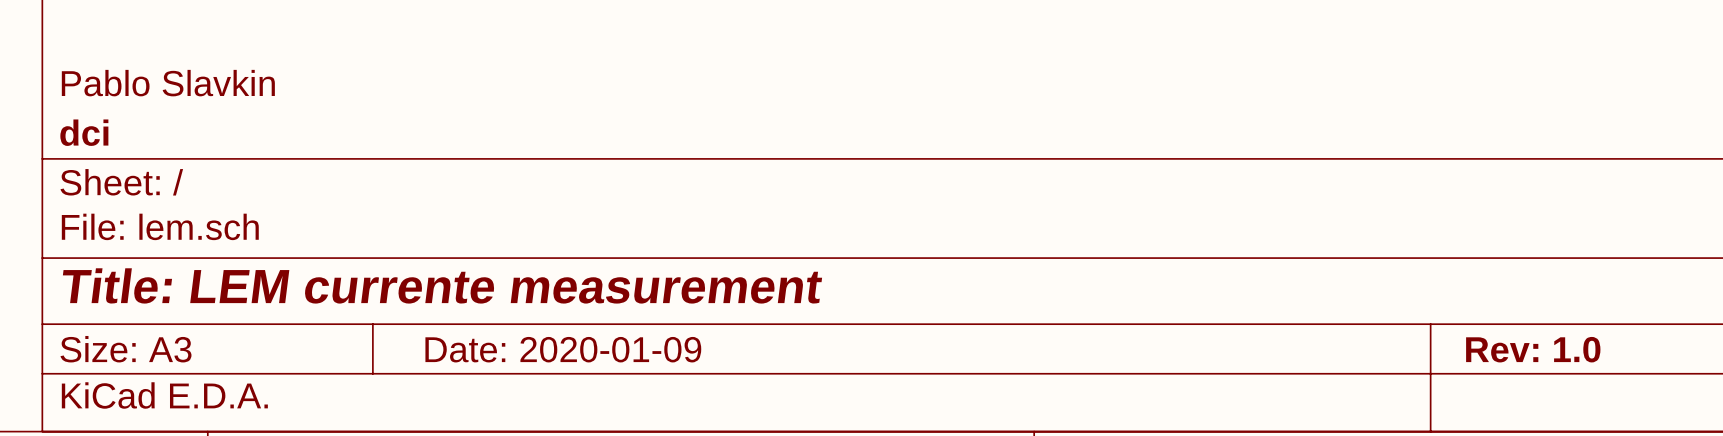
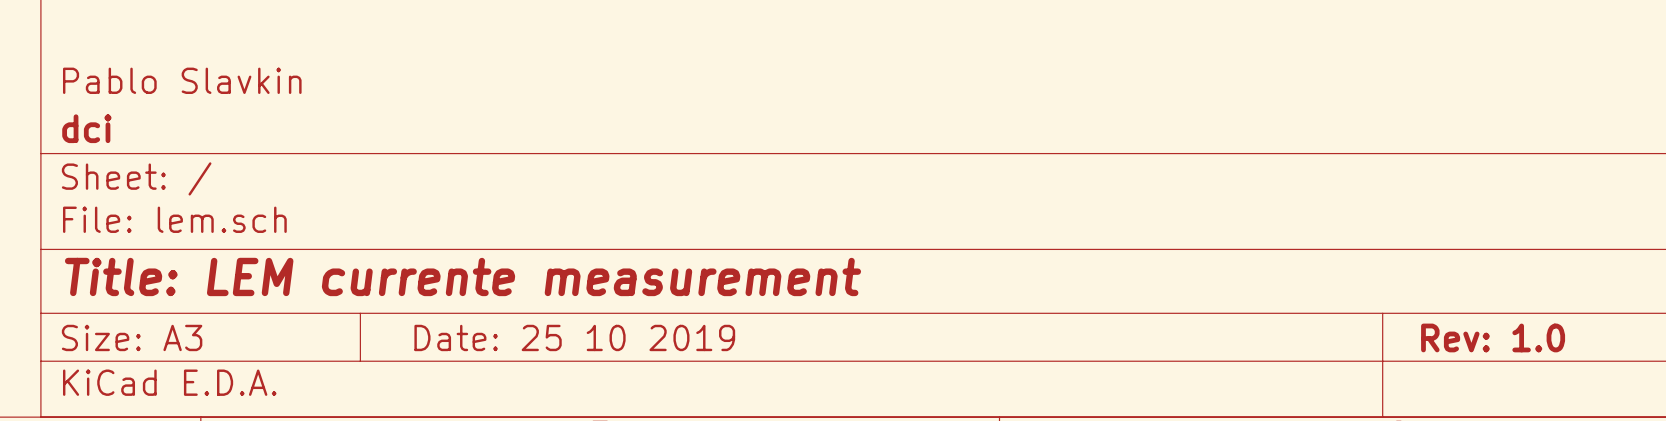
title block: Date: 2020-01-09 (563, 349) -> Date: 25 10 2019 (574, 337)

